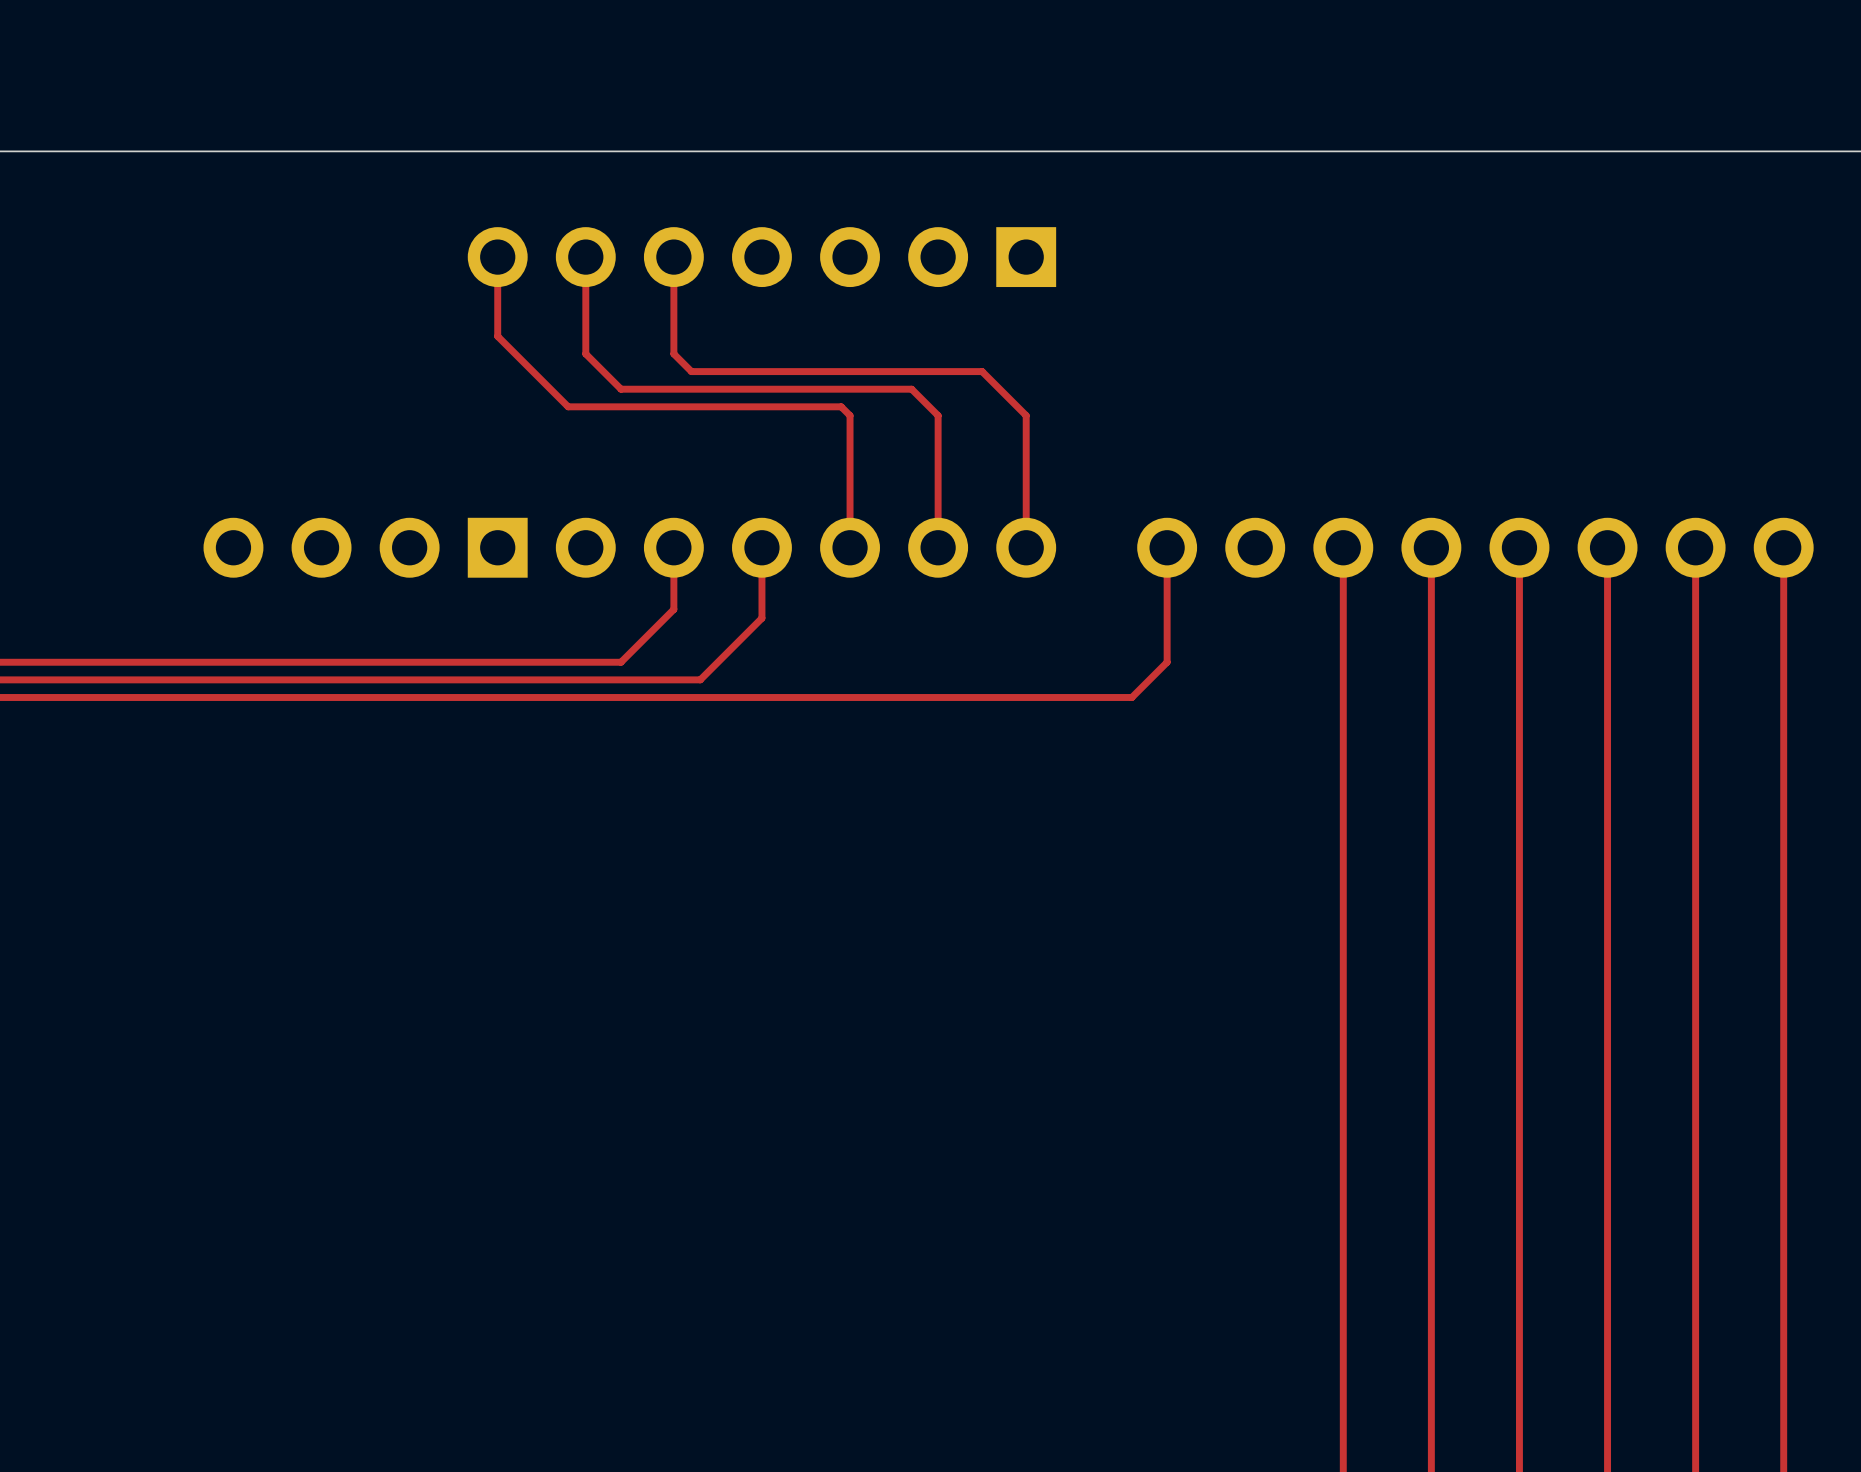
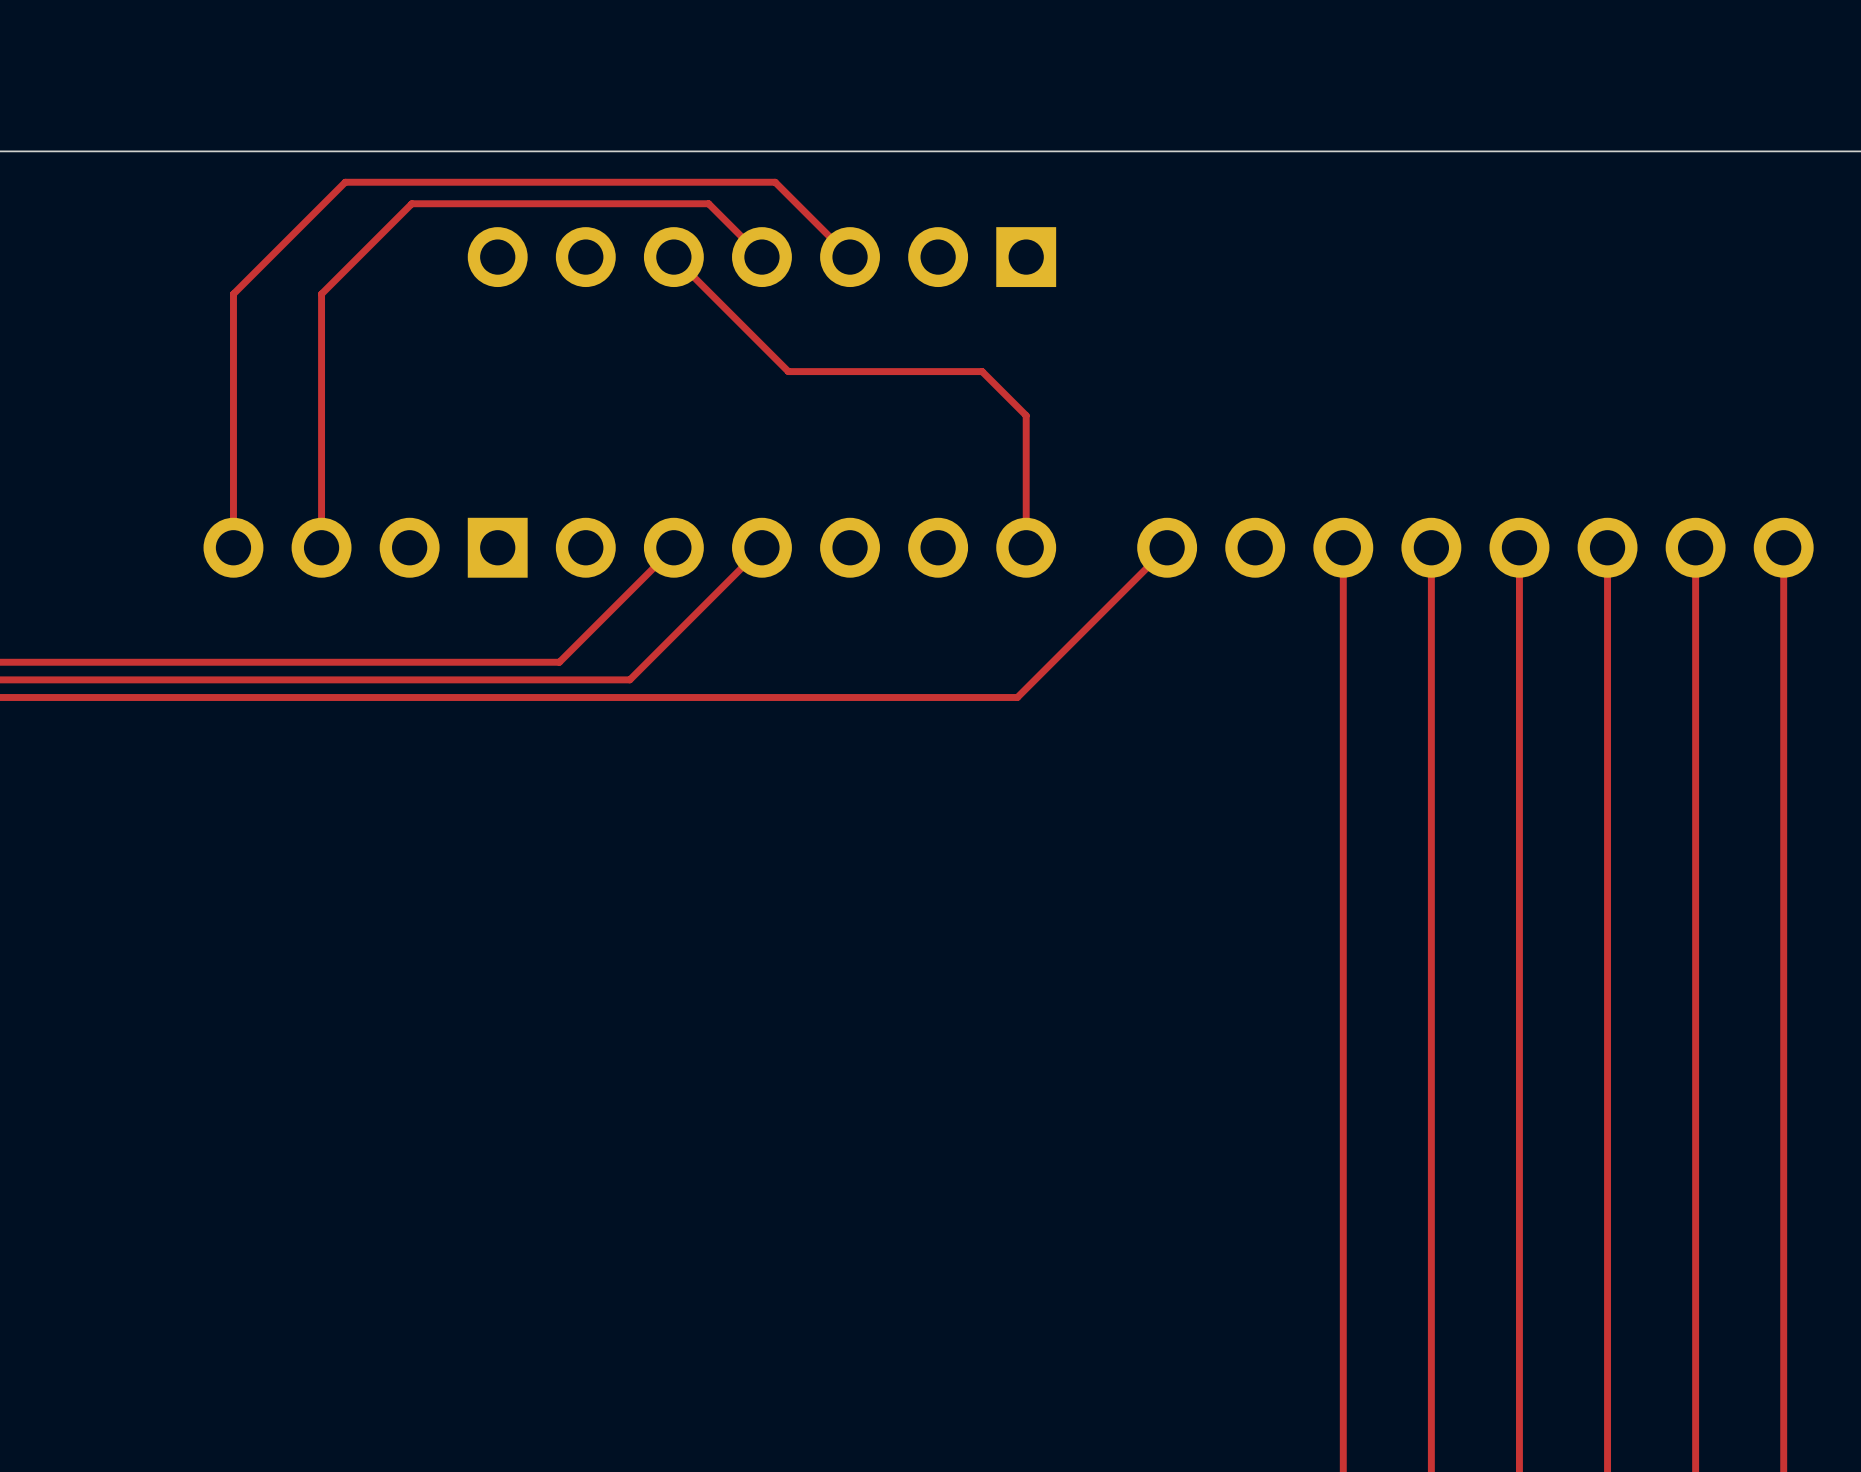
track: (497, 257) (497, 336) (568, 406) (841, 406) (850, 415) (850, 547) -> none
track: (585, 257) (585, 353) (621, 389) (911, 389) (938, 415) (938, 547) -> none
track: (673, 257) (673, 353) (691, 371) (788, 371) -> (673, 257) (788, 371)
track: none -> (761, 257) (708, 203) (411, 203) (321, 294) (321, 547)
track: none -> (850, 257) (775, 182) (345, 182) (233, 294) (233, 547)
track: (673, 547) (673, 609) (621, 662) (559, 662) -> (673, 547) (559, 662)
track: (761, 547) (761, 618) (700, 679) (629, 679) -> (761, 547) (629, 679)
track: (1167, 547) (1167, 662) (1131, 697) (1017, 697) -> (1167, 547) (1017, 697)

